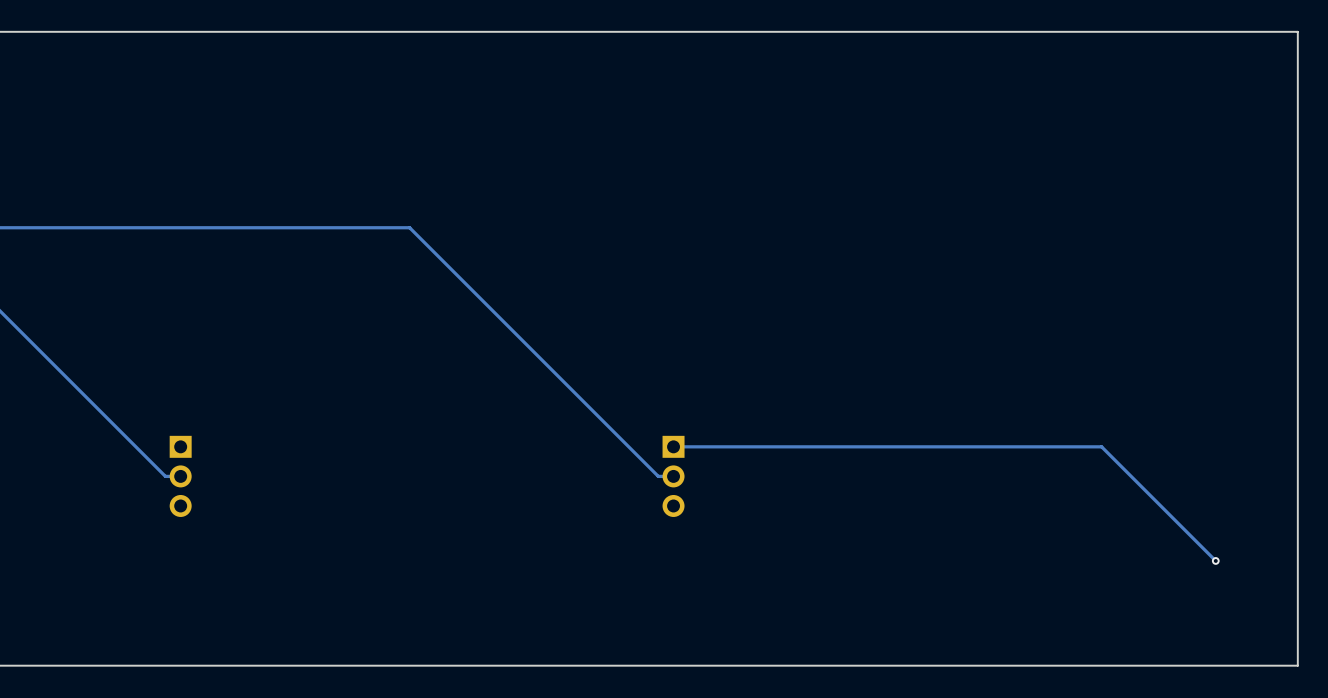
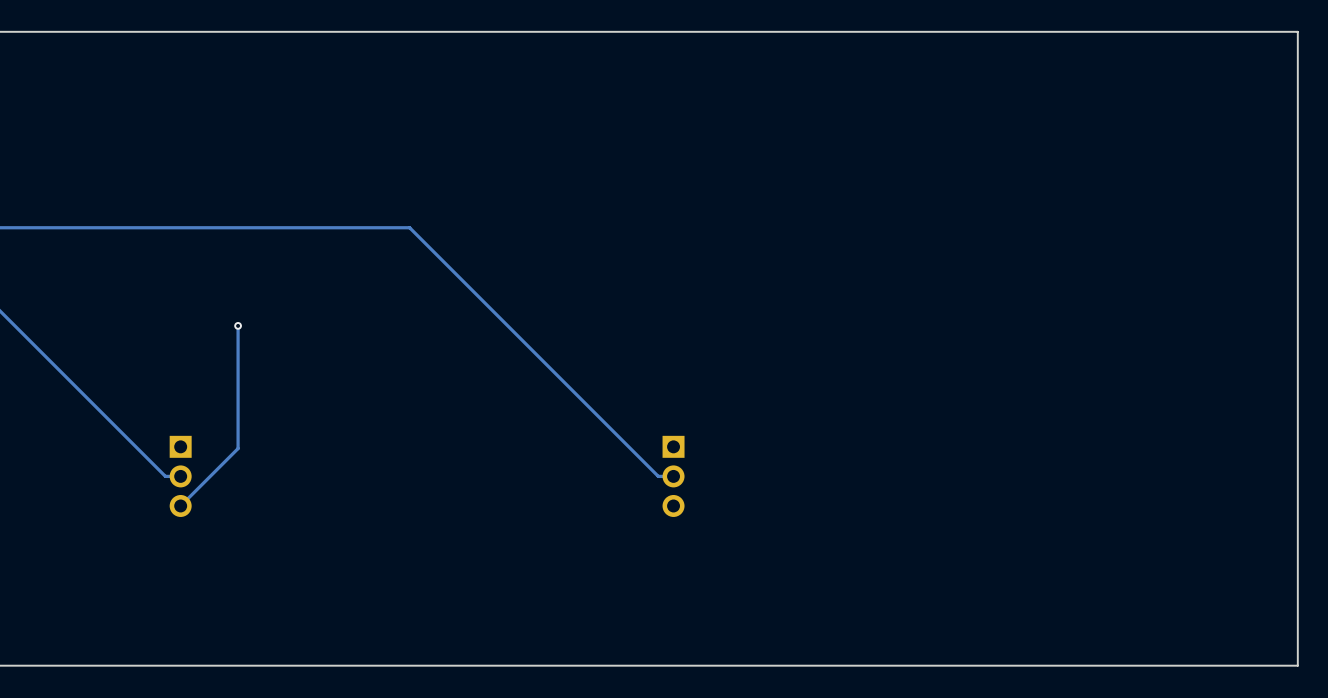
track: none -> (238, 325) (238, 448) (180, 505)
via: none -> (238, 325)
track: (673, 446) (1101, 446) (1215, 560) -> none
via: (1215, 560) -> none

